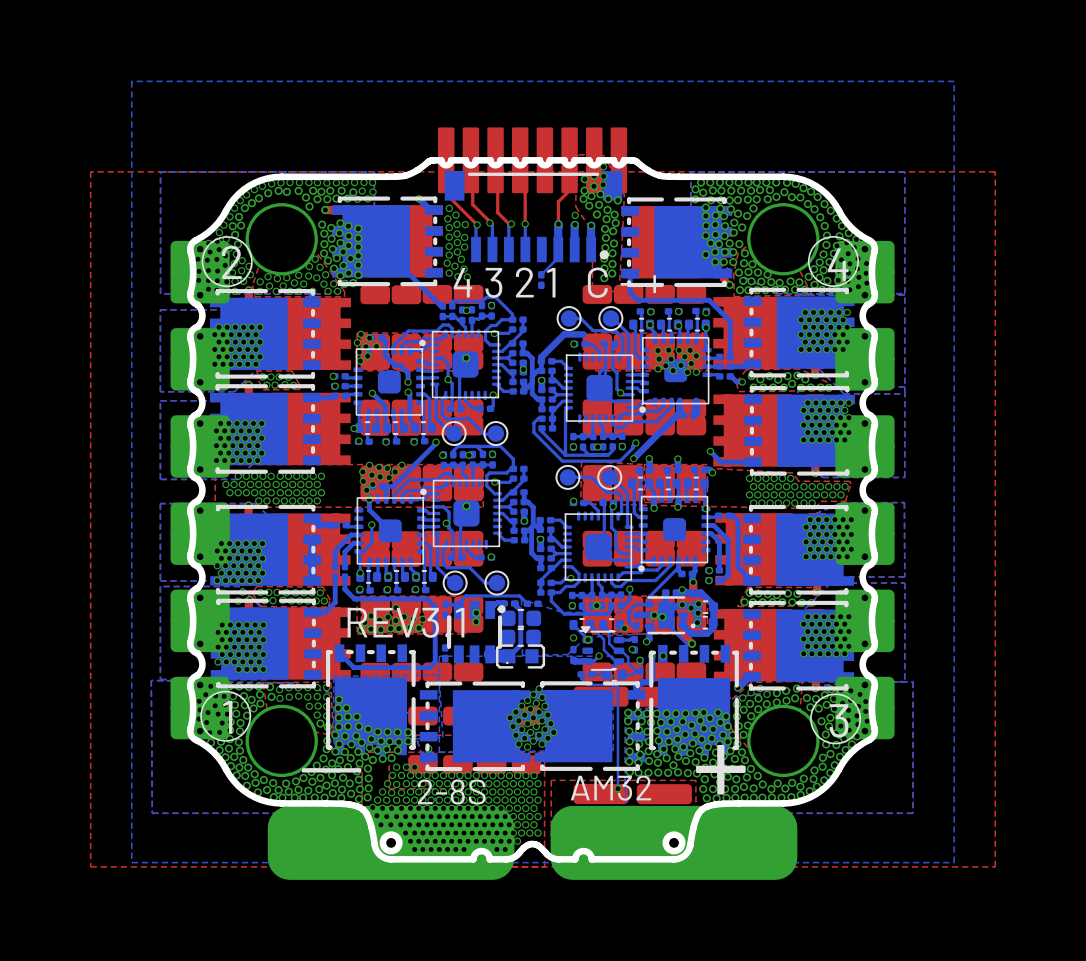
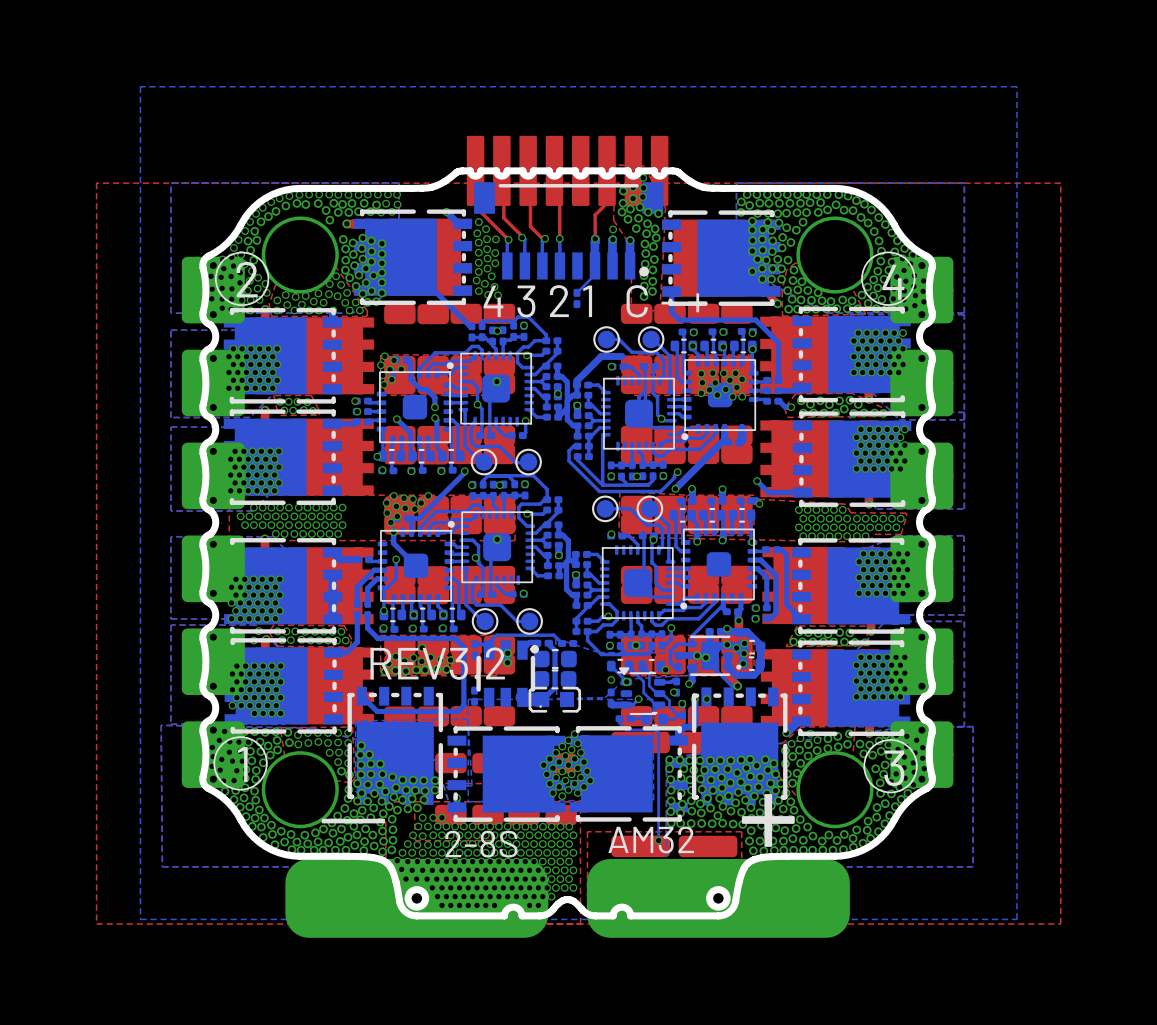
text: REV3.1 (406, 622) -> REV3.2 (437, 663)

